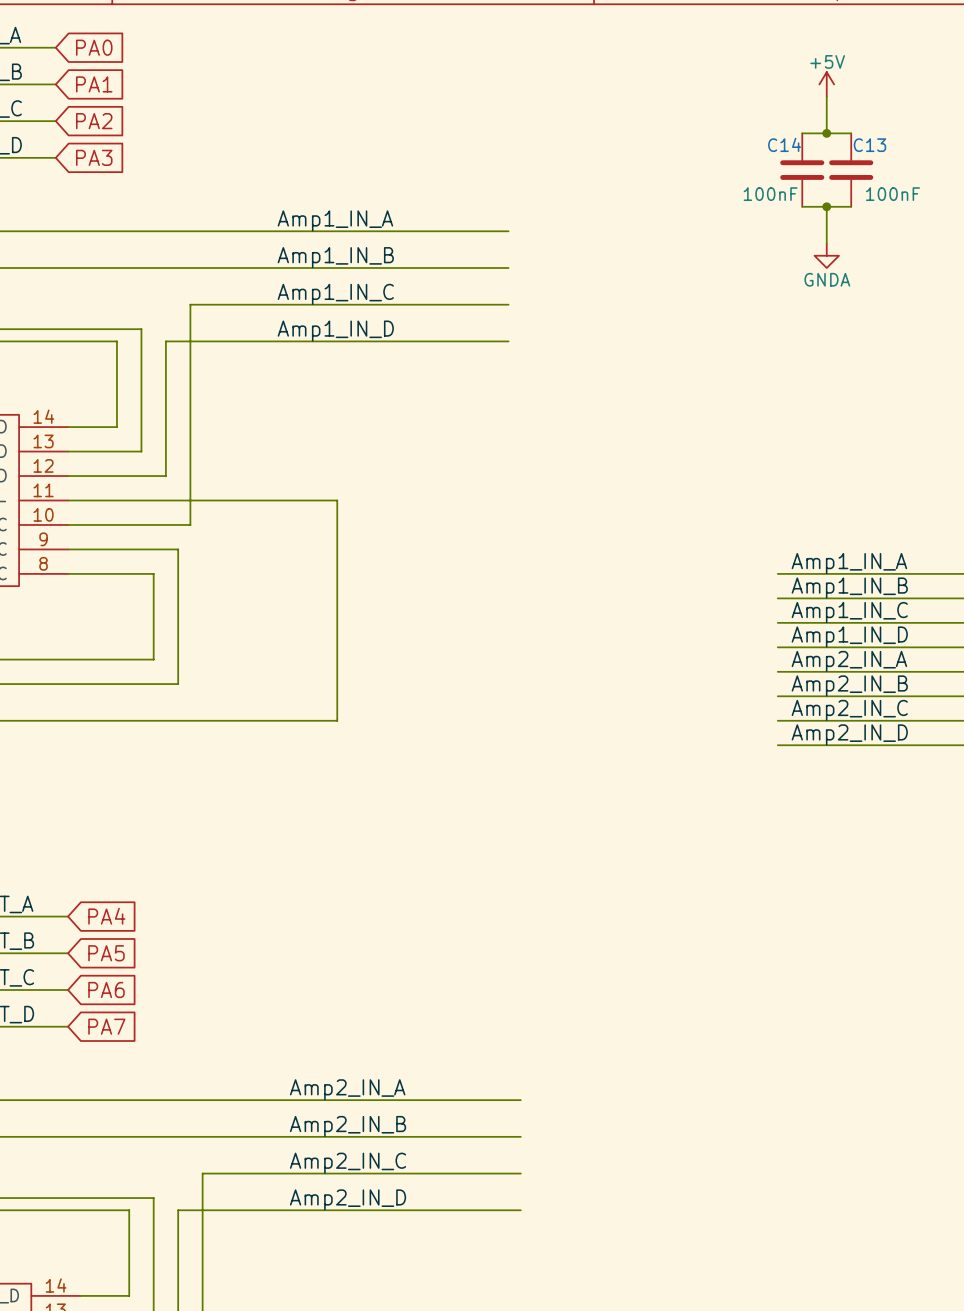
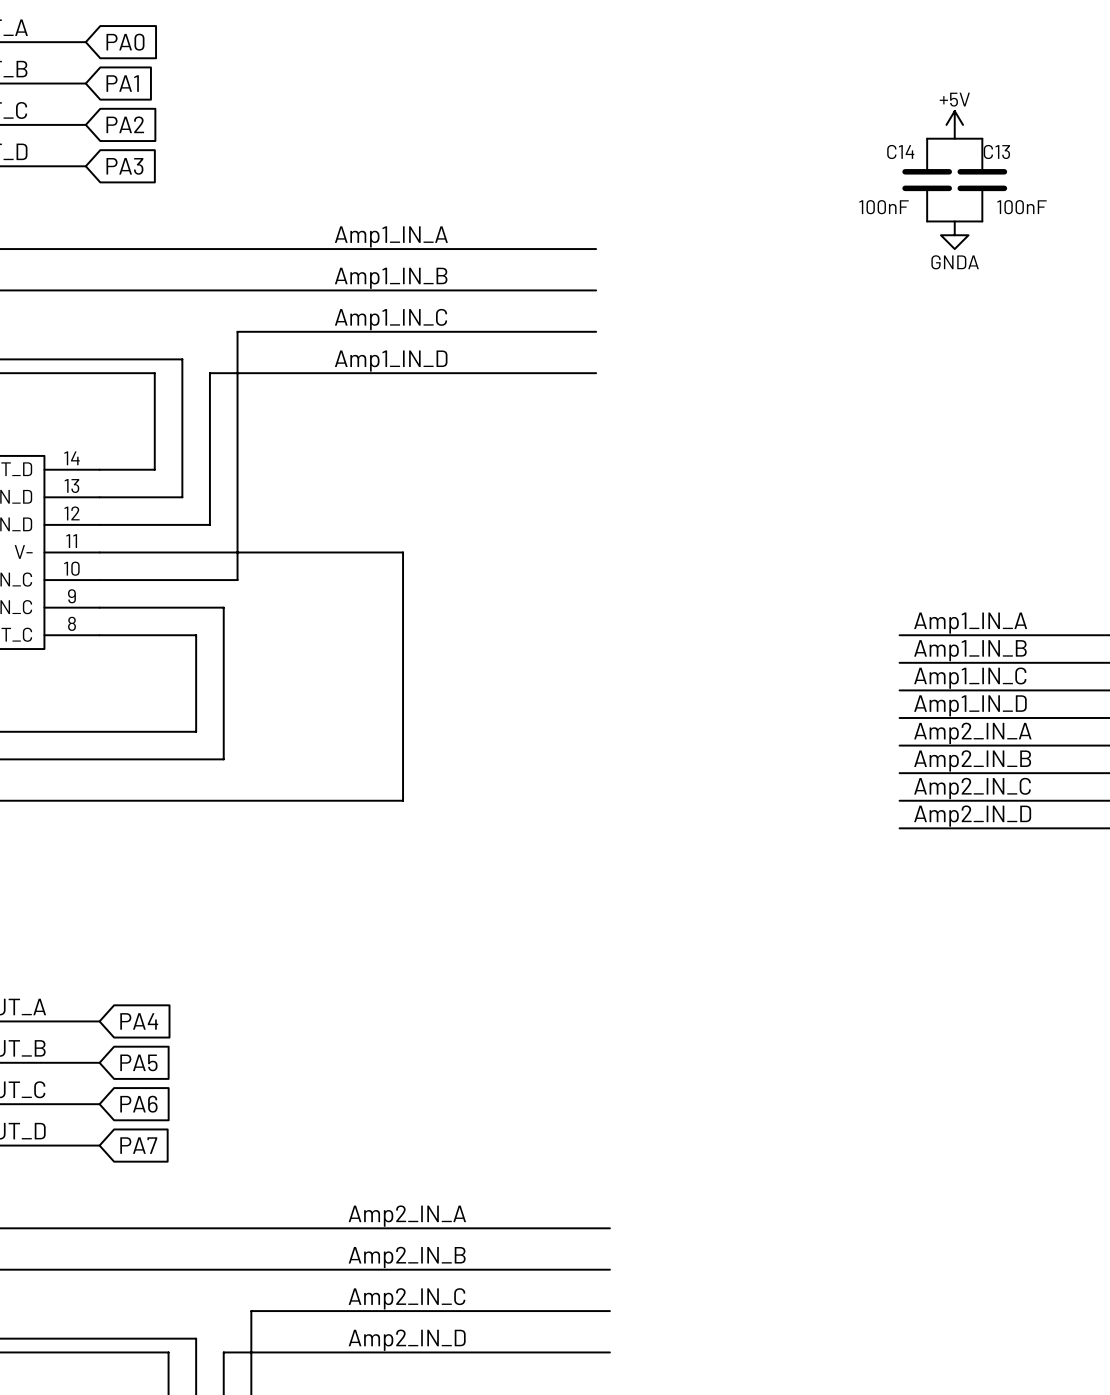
power symbol position: +5V (826, 84) -> +5V (954, 124)
junction: (826, 133) -> none
wire: (826, 206) (826, 243) -> none
junction: (826, 206) -> none
power symbol position: GNDA (826, 255) -> GNDA (954, 235)

